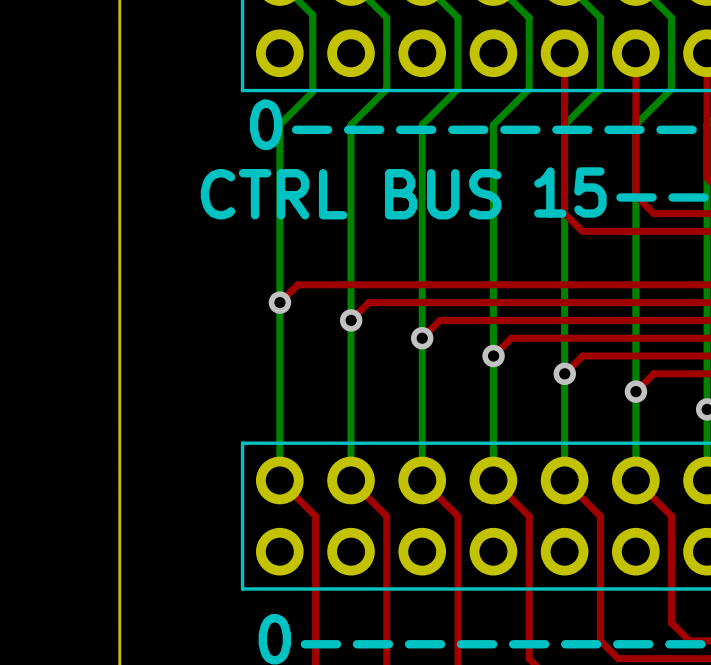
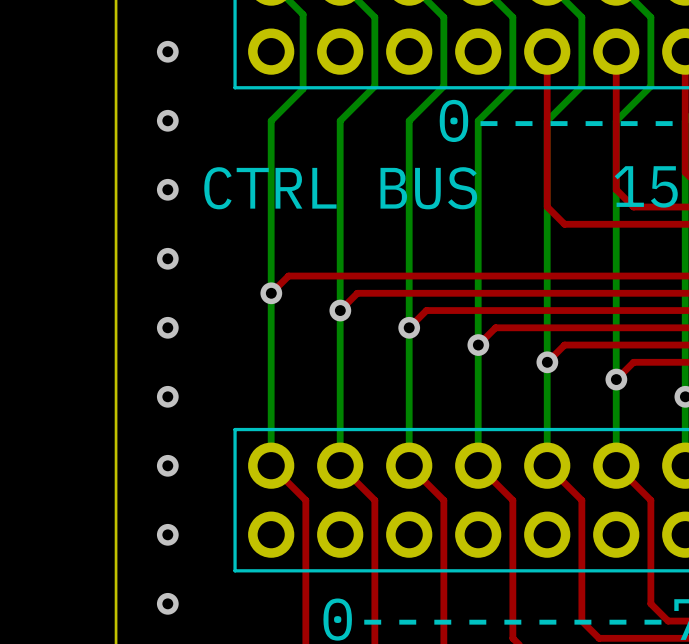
via: none -> (167, 51)
via: none -> (167, 120)
via: none -> (167, 189)
via: none -> (167, 258)
via: none -> (167, 327)
via: none -> (167, 396)
via: none -> (167, 465)
via: none -> (167, 534)
via: none -> (167, 603)

